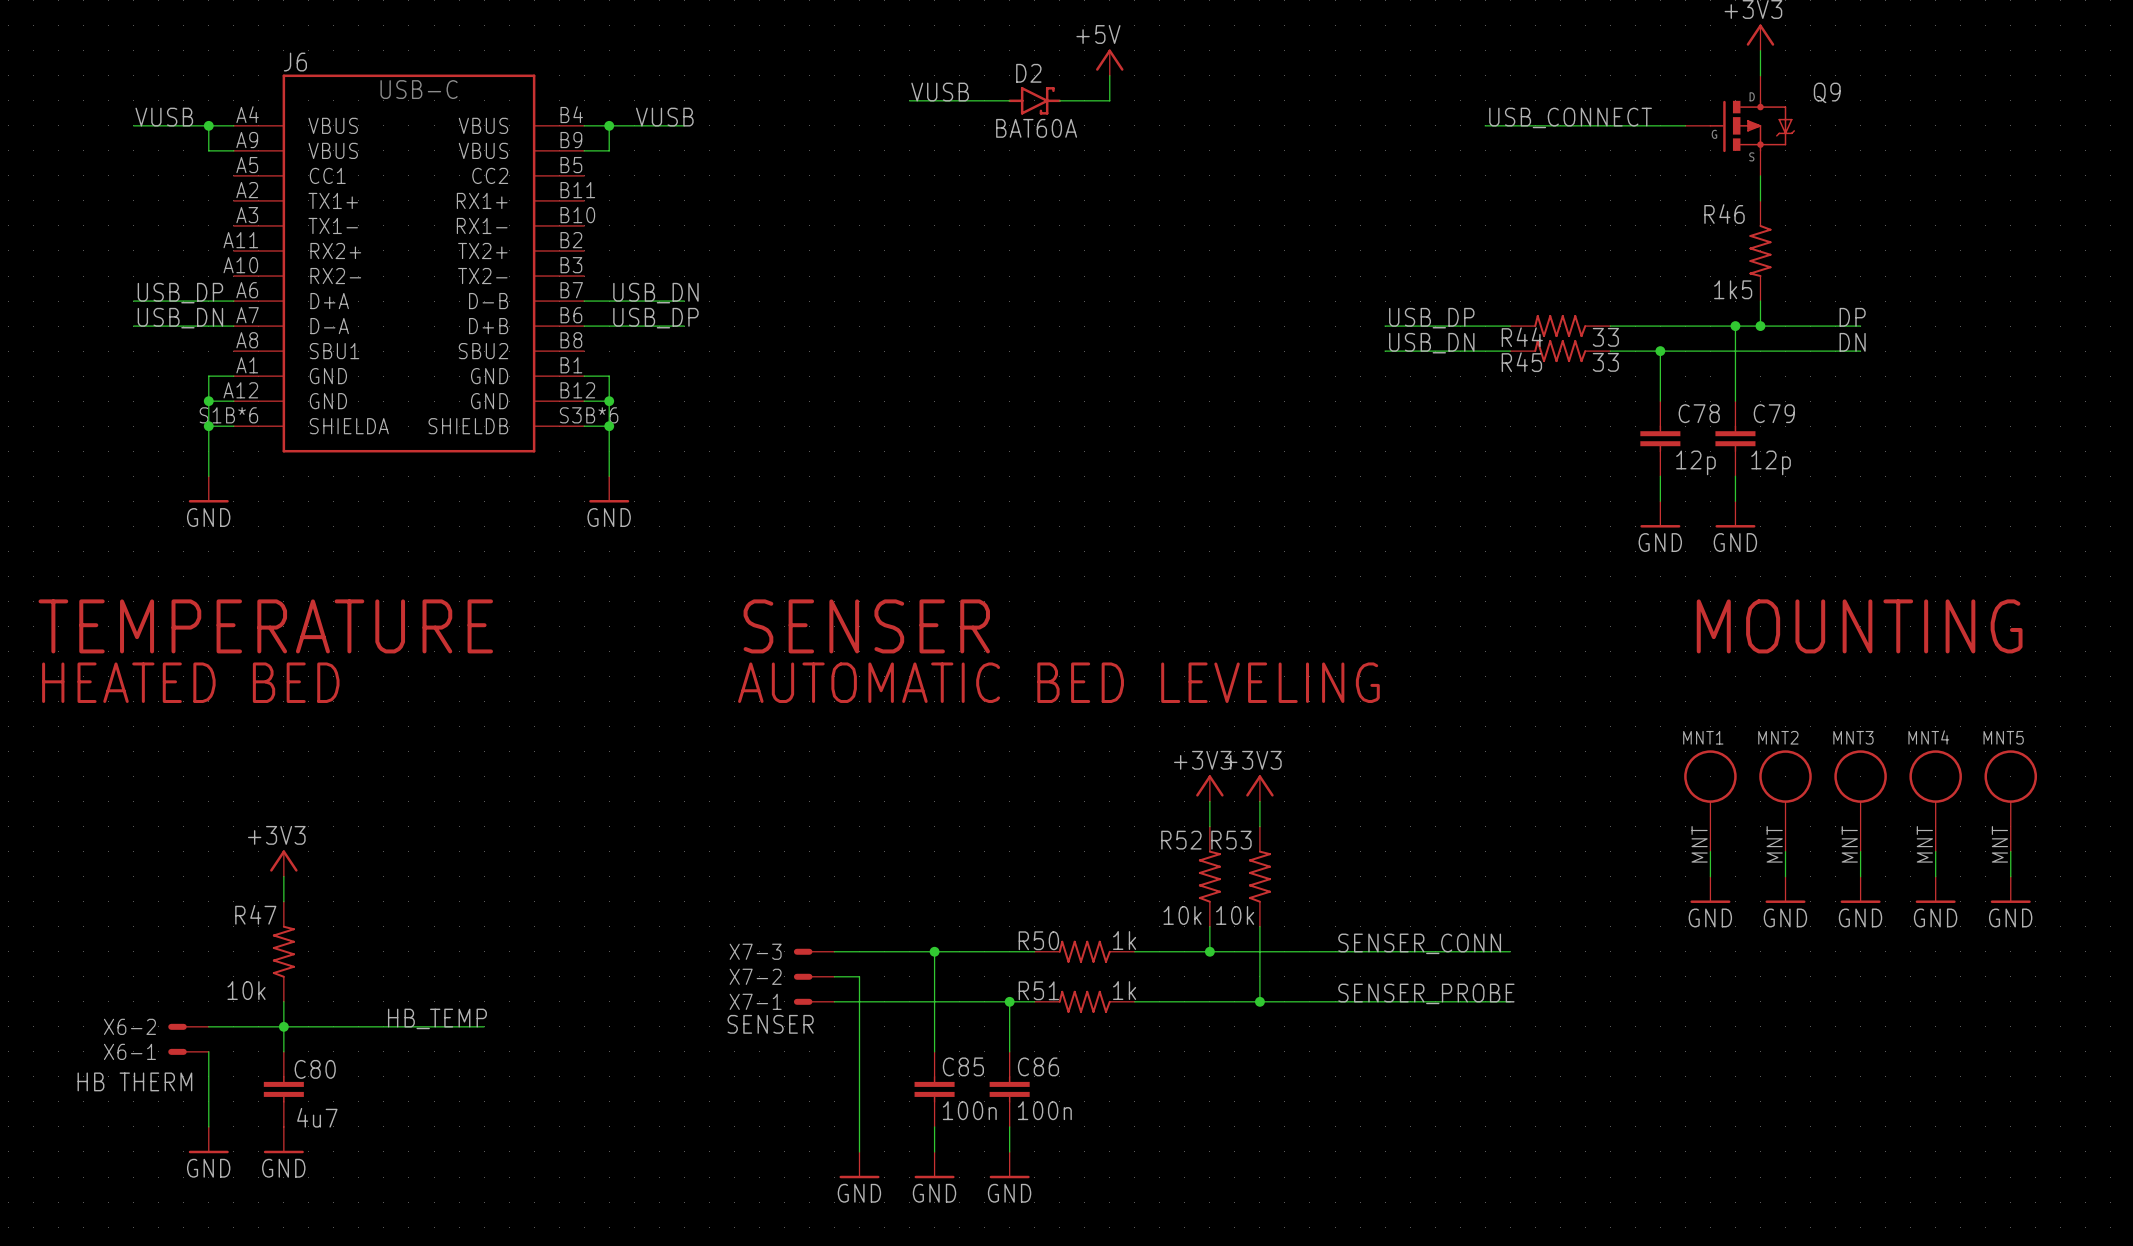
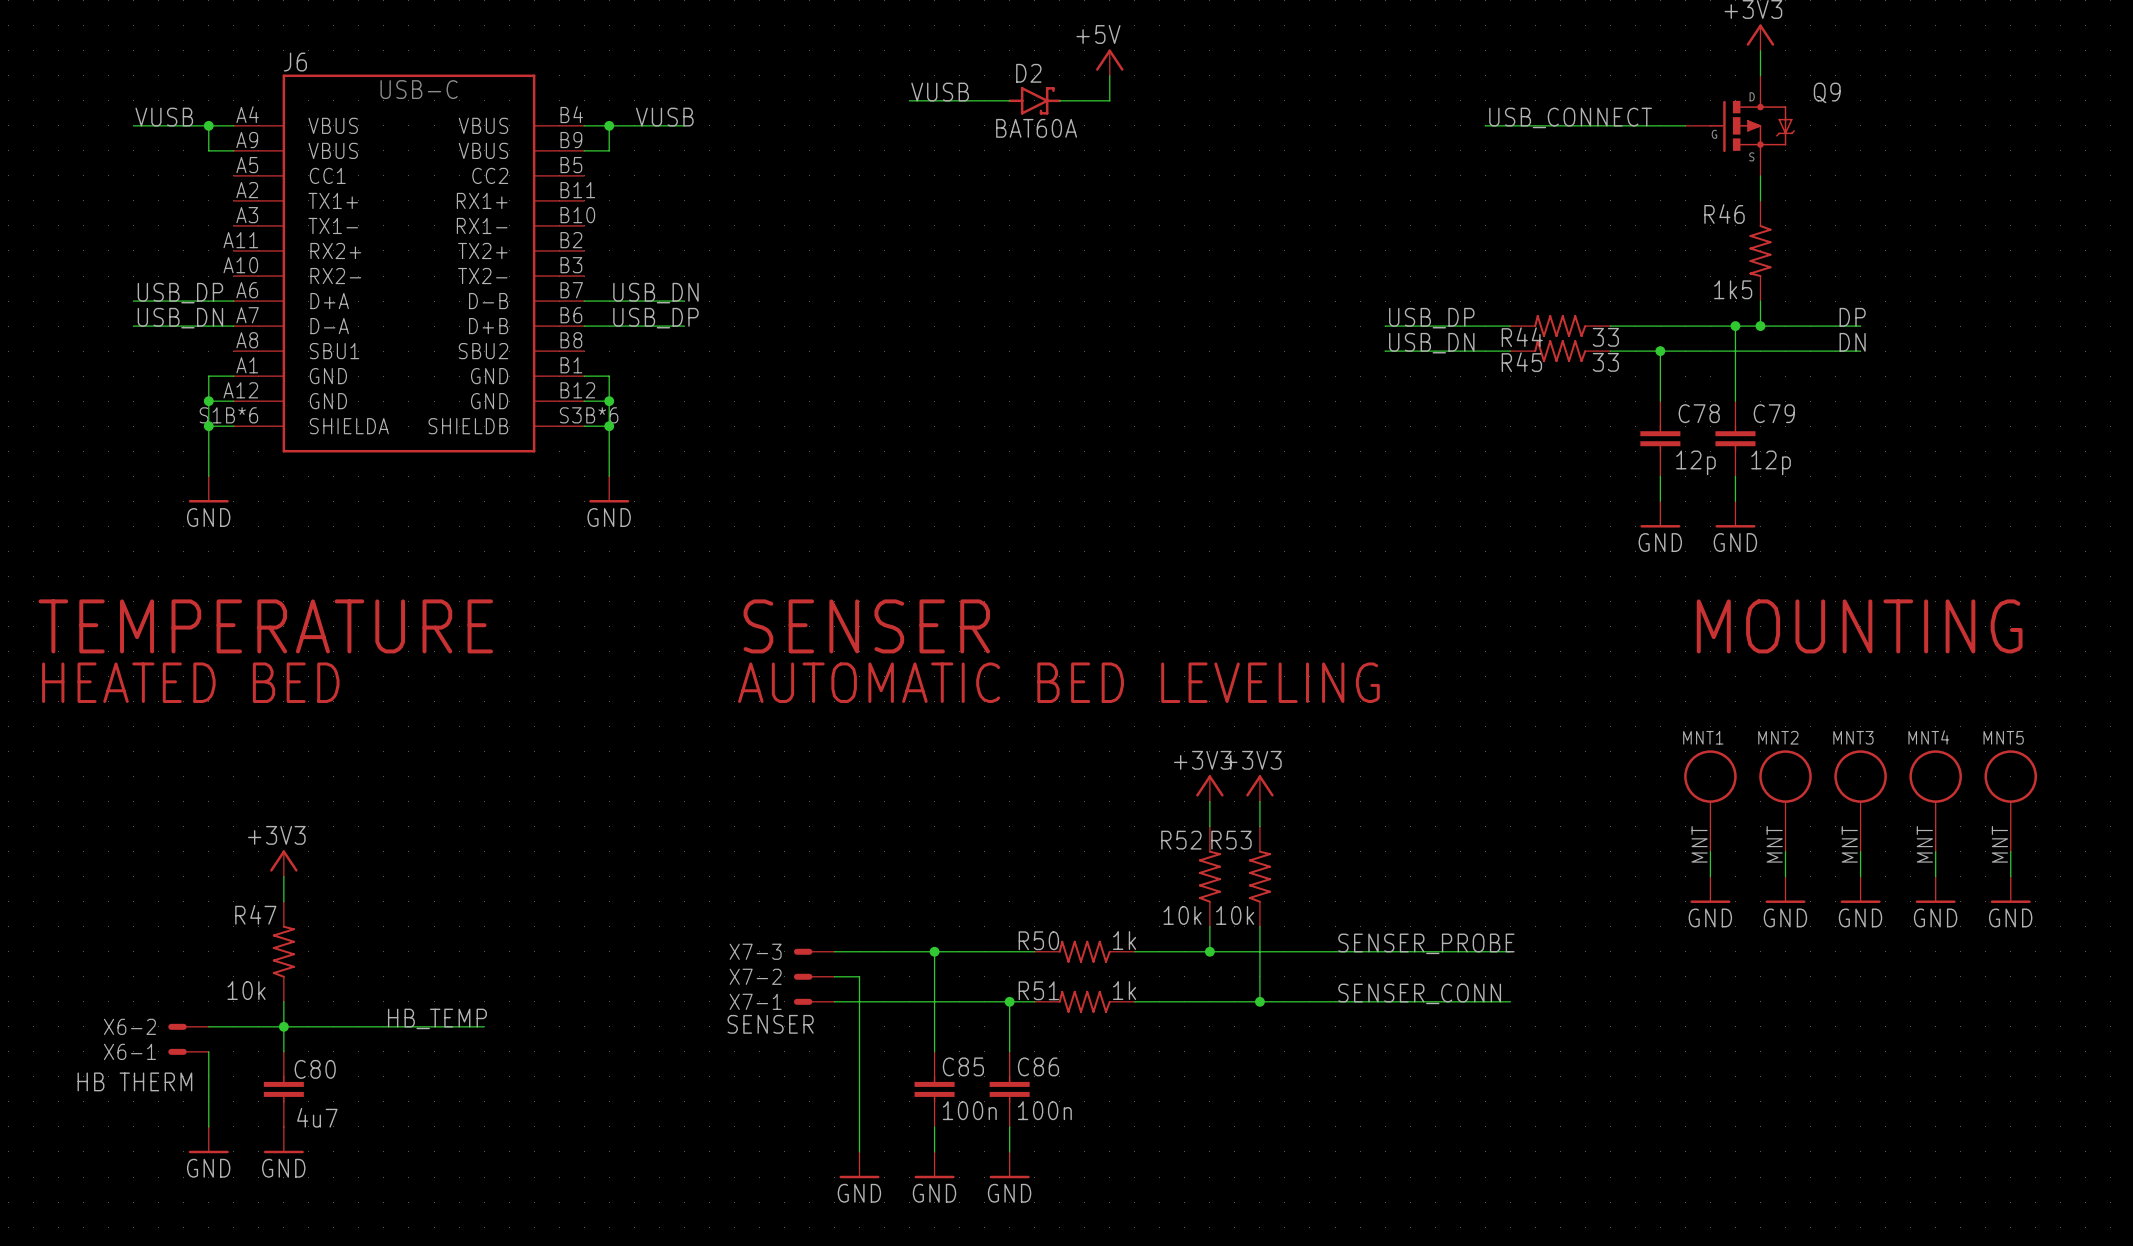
label: SENSER_CONN (1419, 943) -> SENSER_PROBE (1426, 943)
label: SENSER_PROBE (1426, 993) -> SENSER_CONN (1419, 993)

